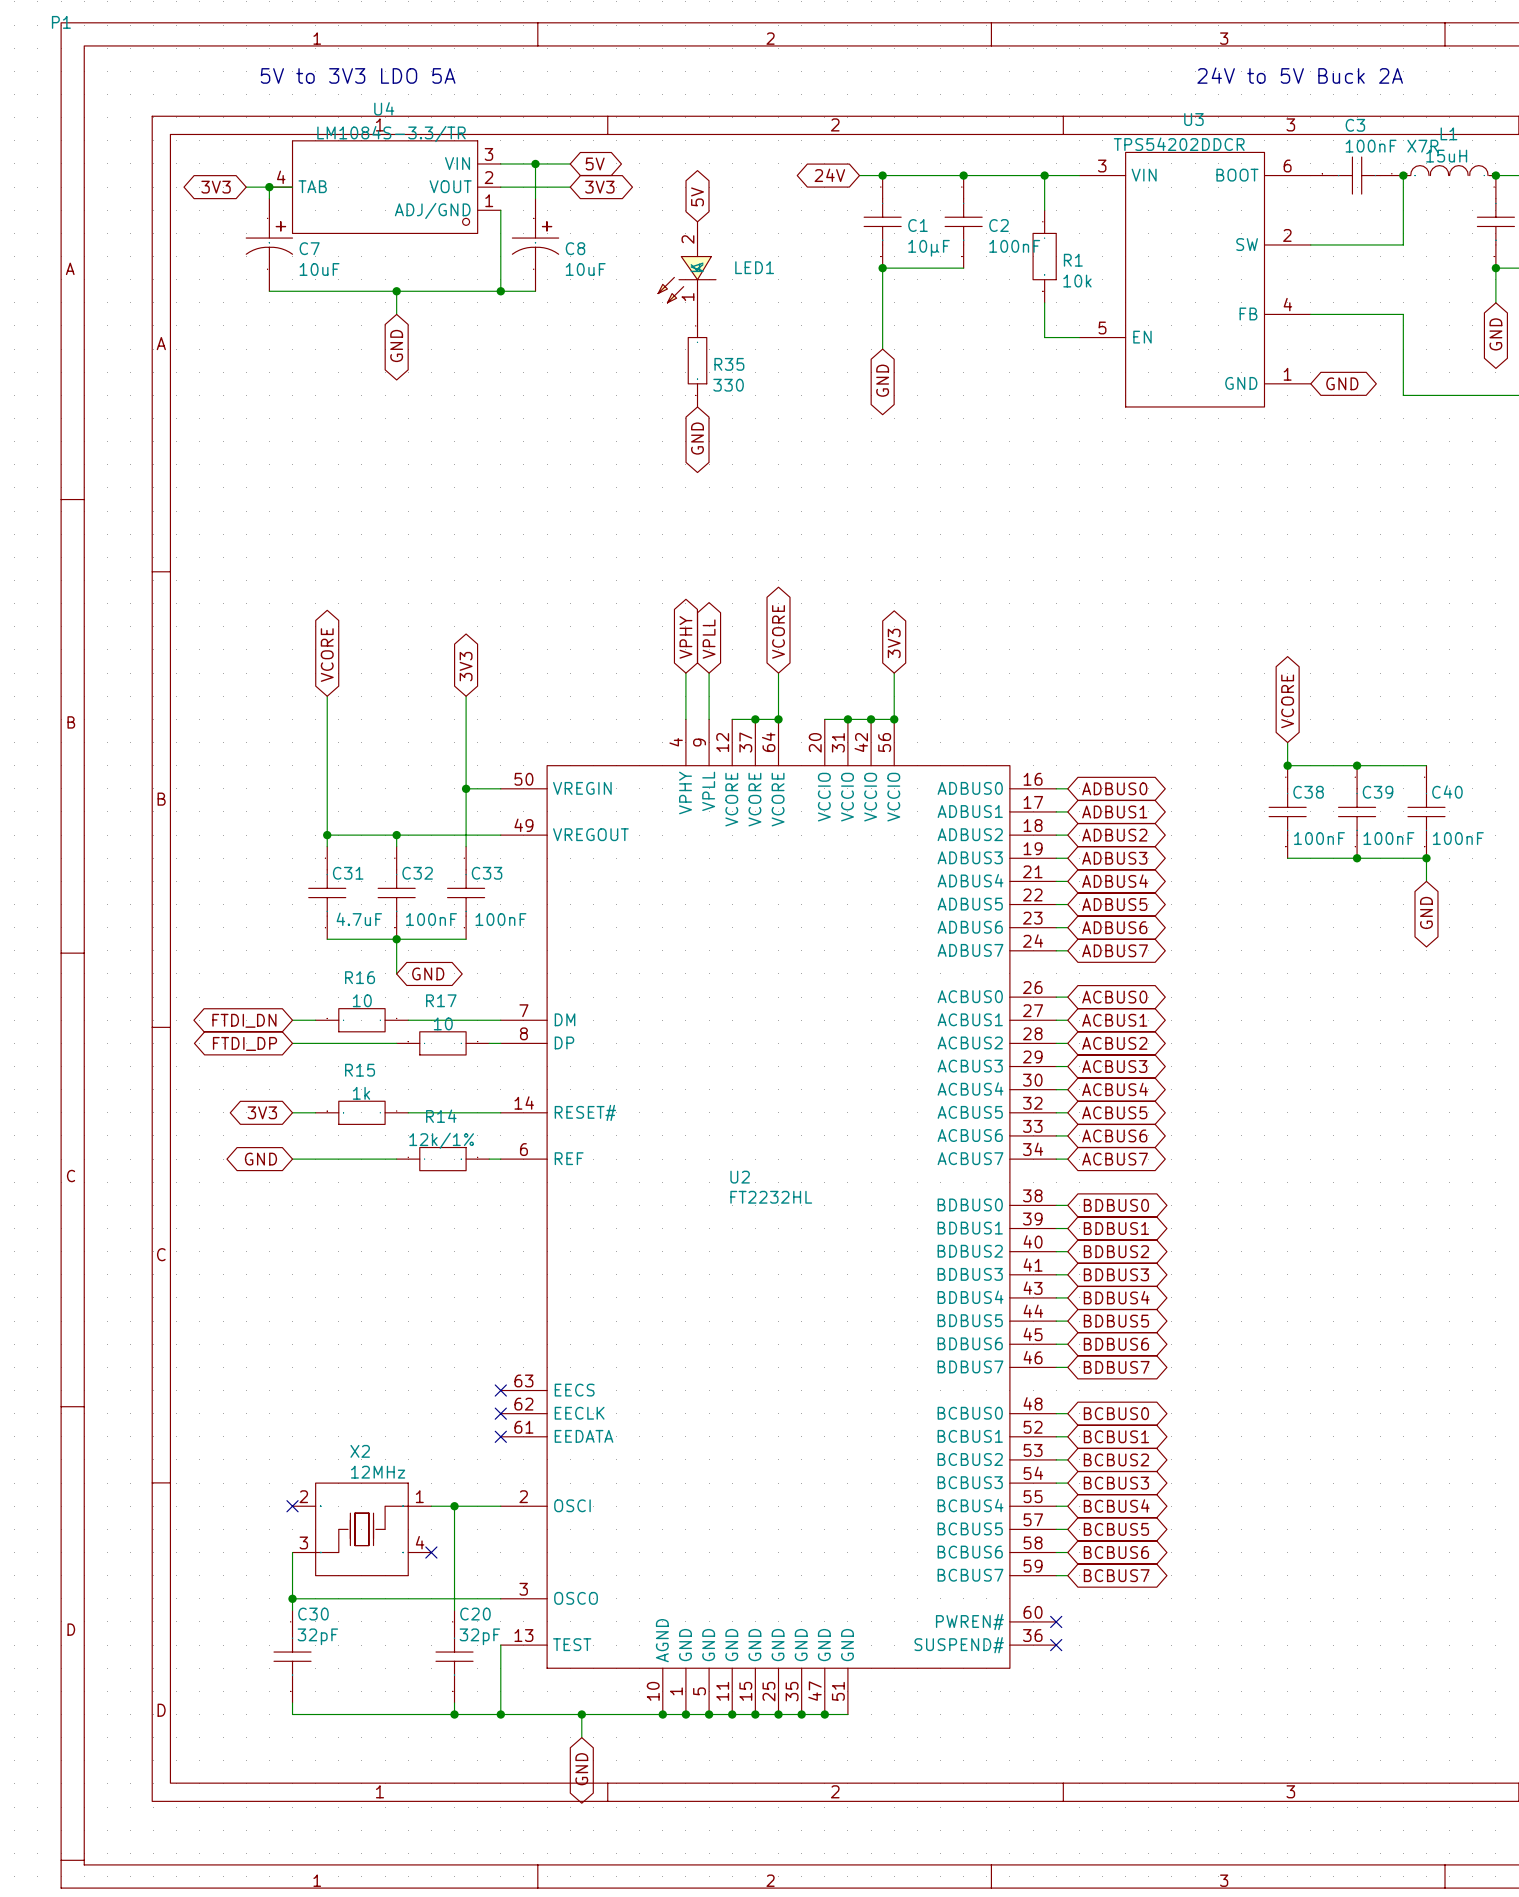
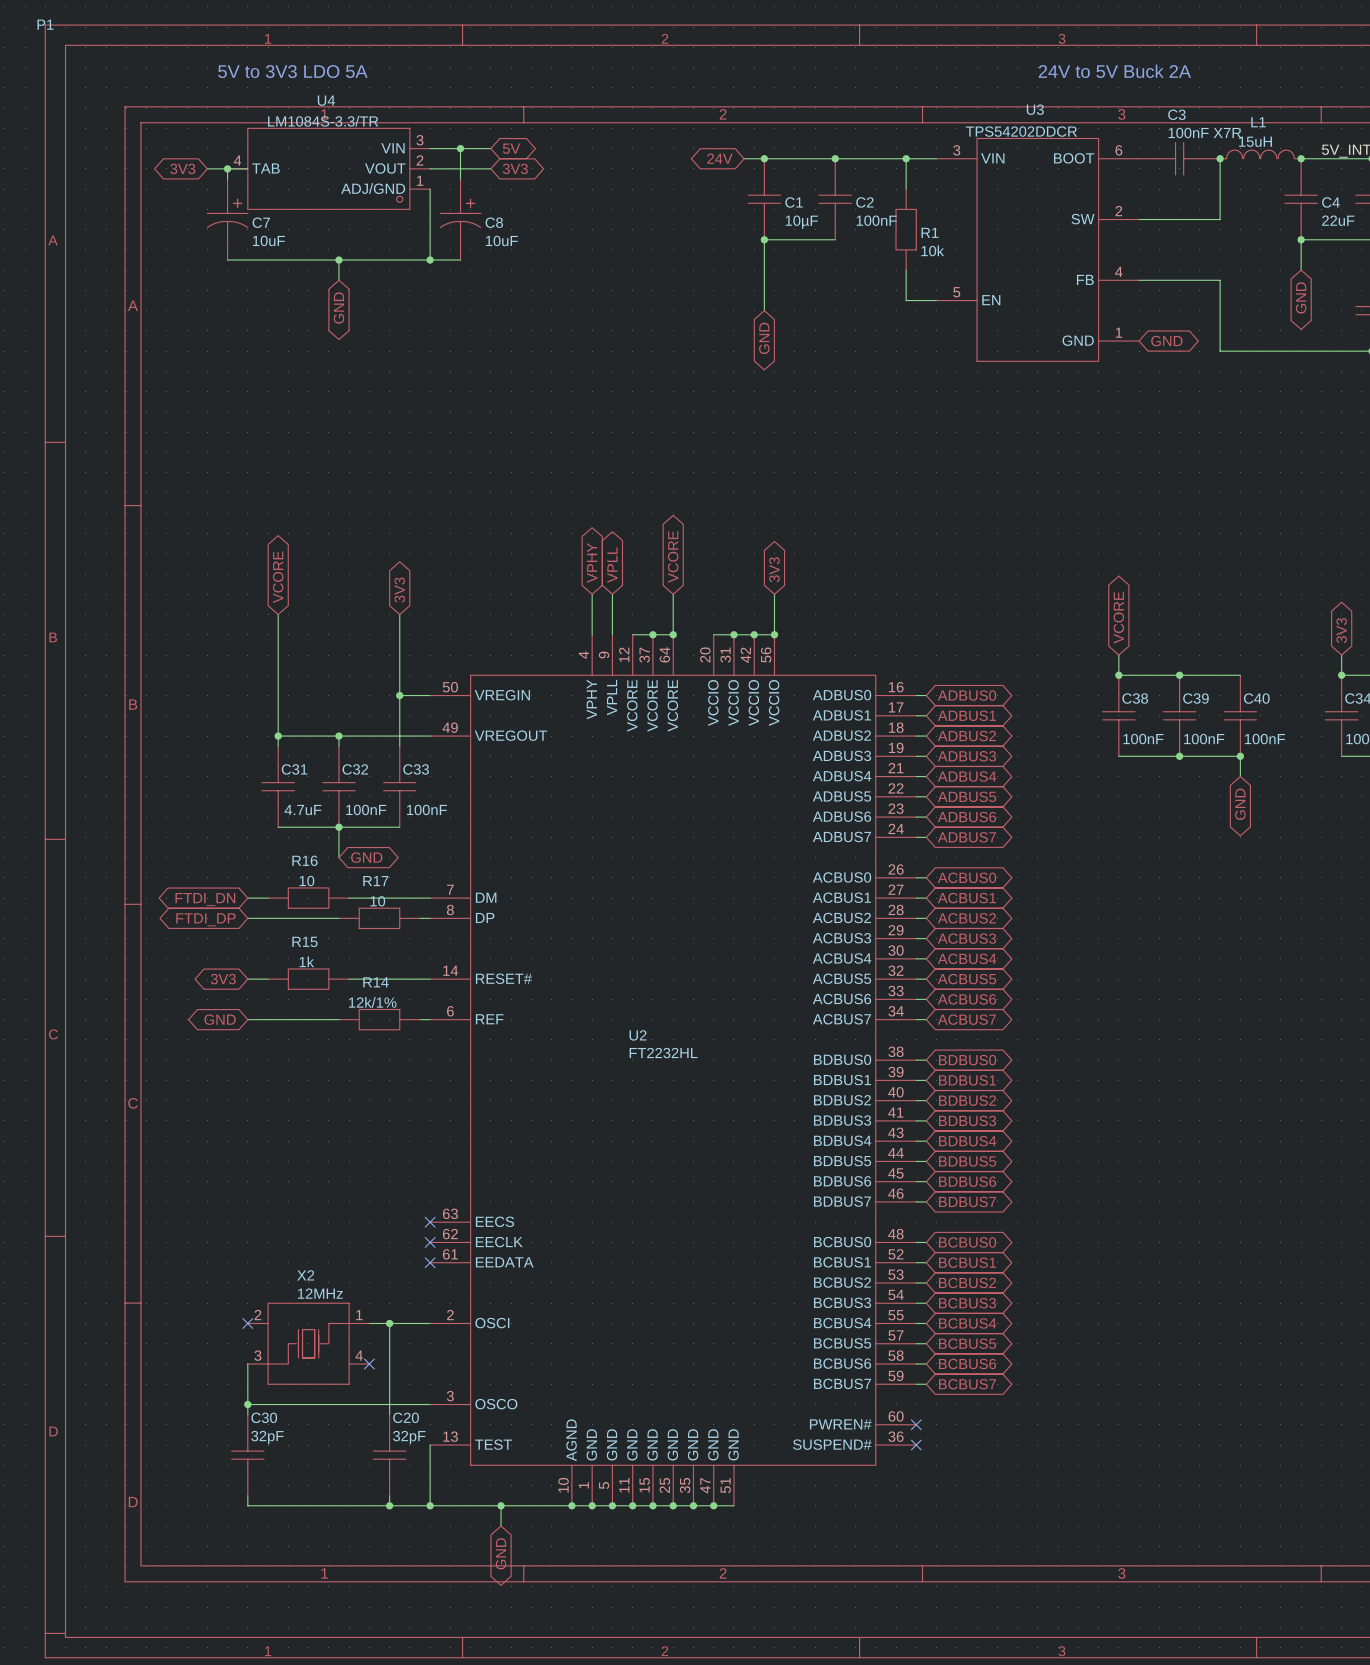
global label: 5V (697, 196) -> none
LED1: (687, 268) -> none
R35: 330 (697, 360) -> none
global label: GND (697, 438) -> none

